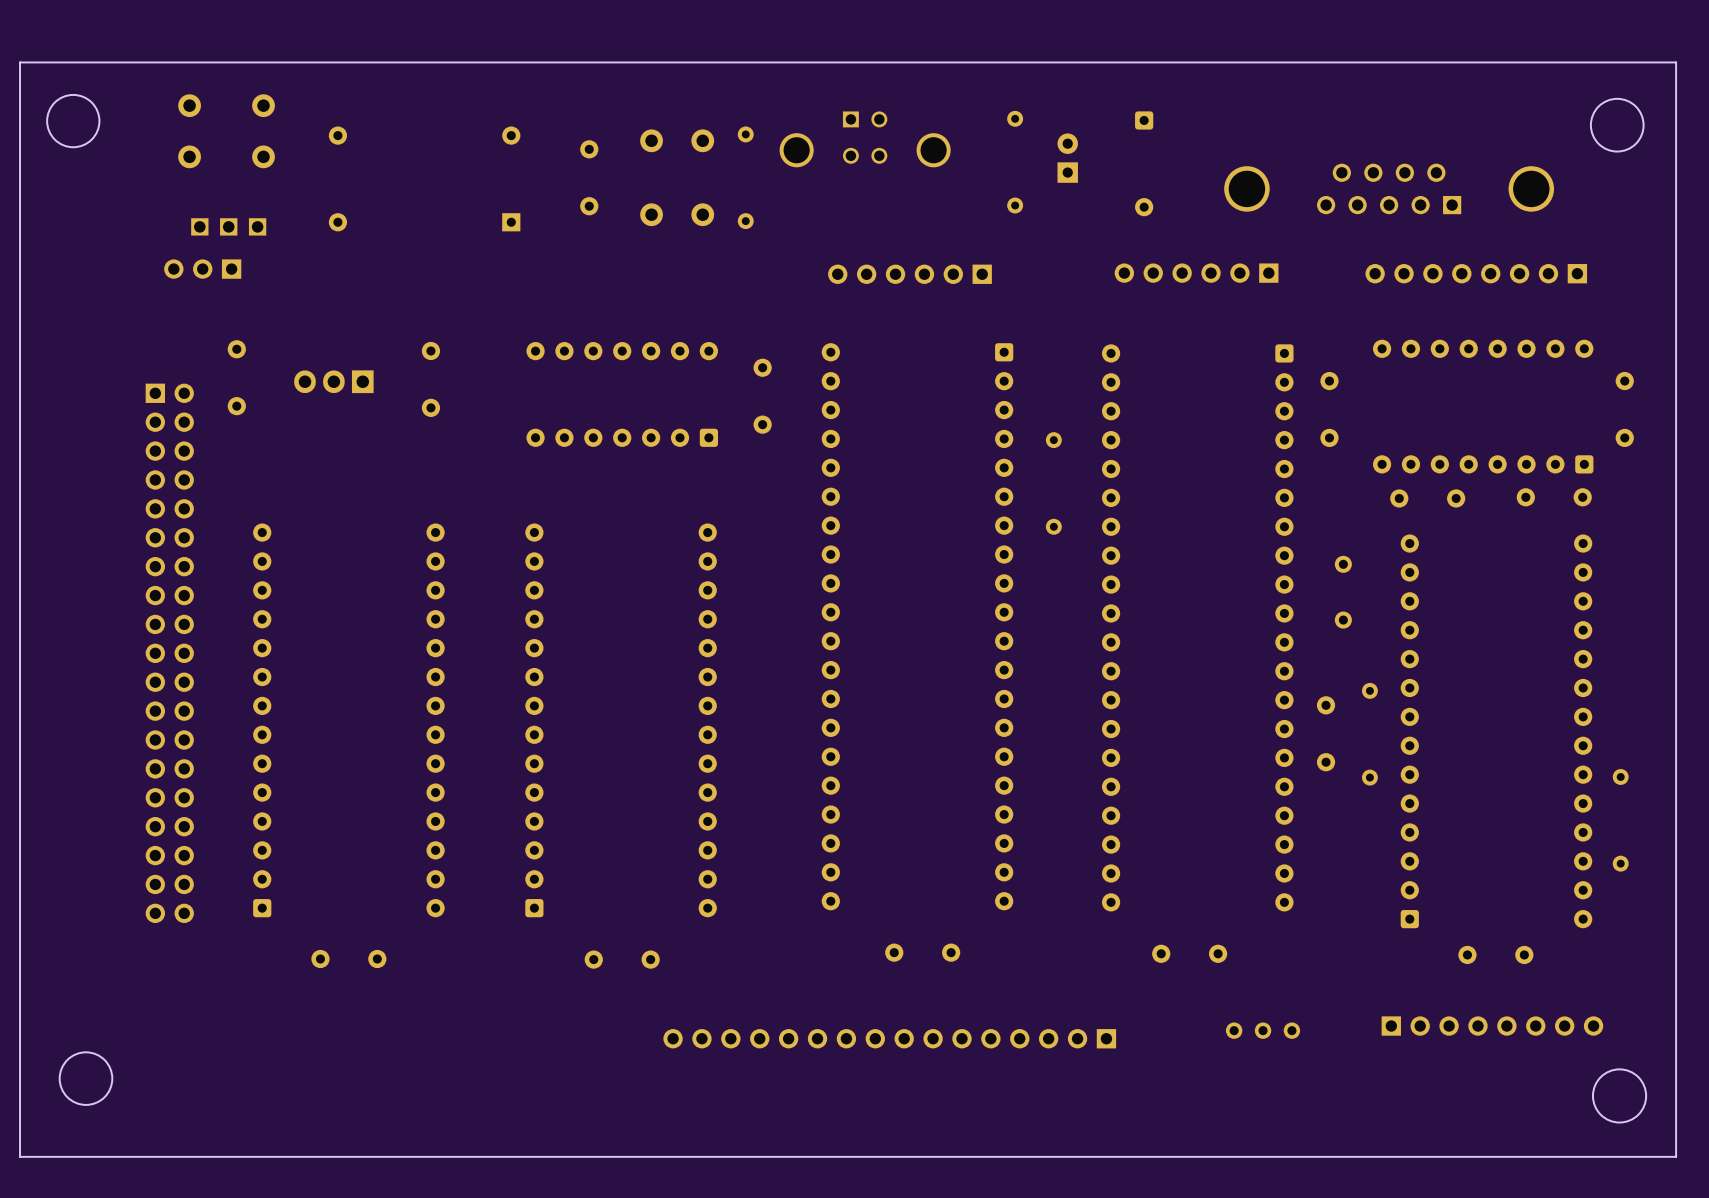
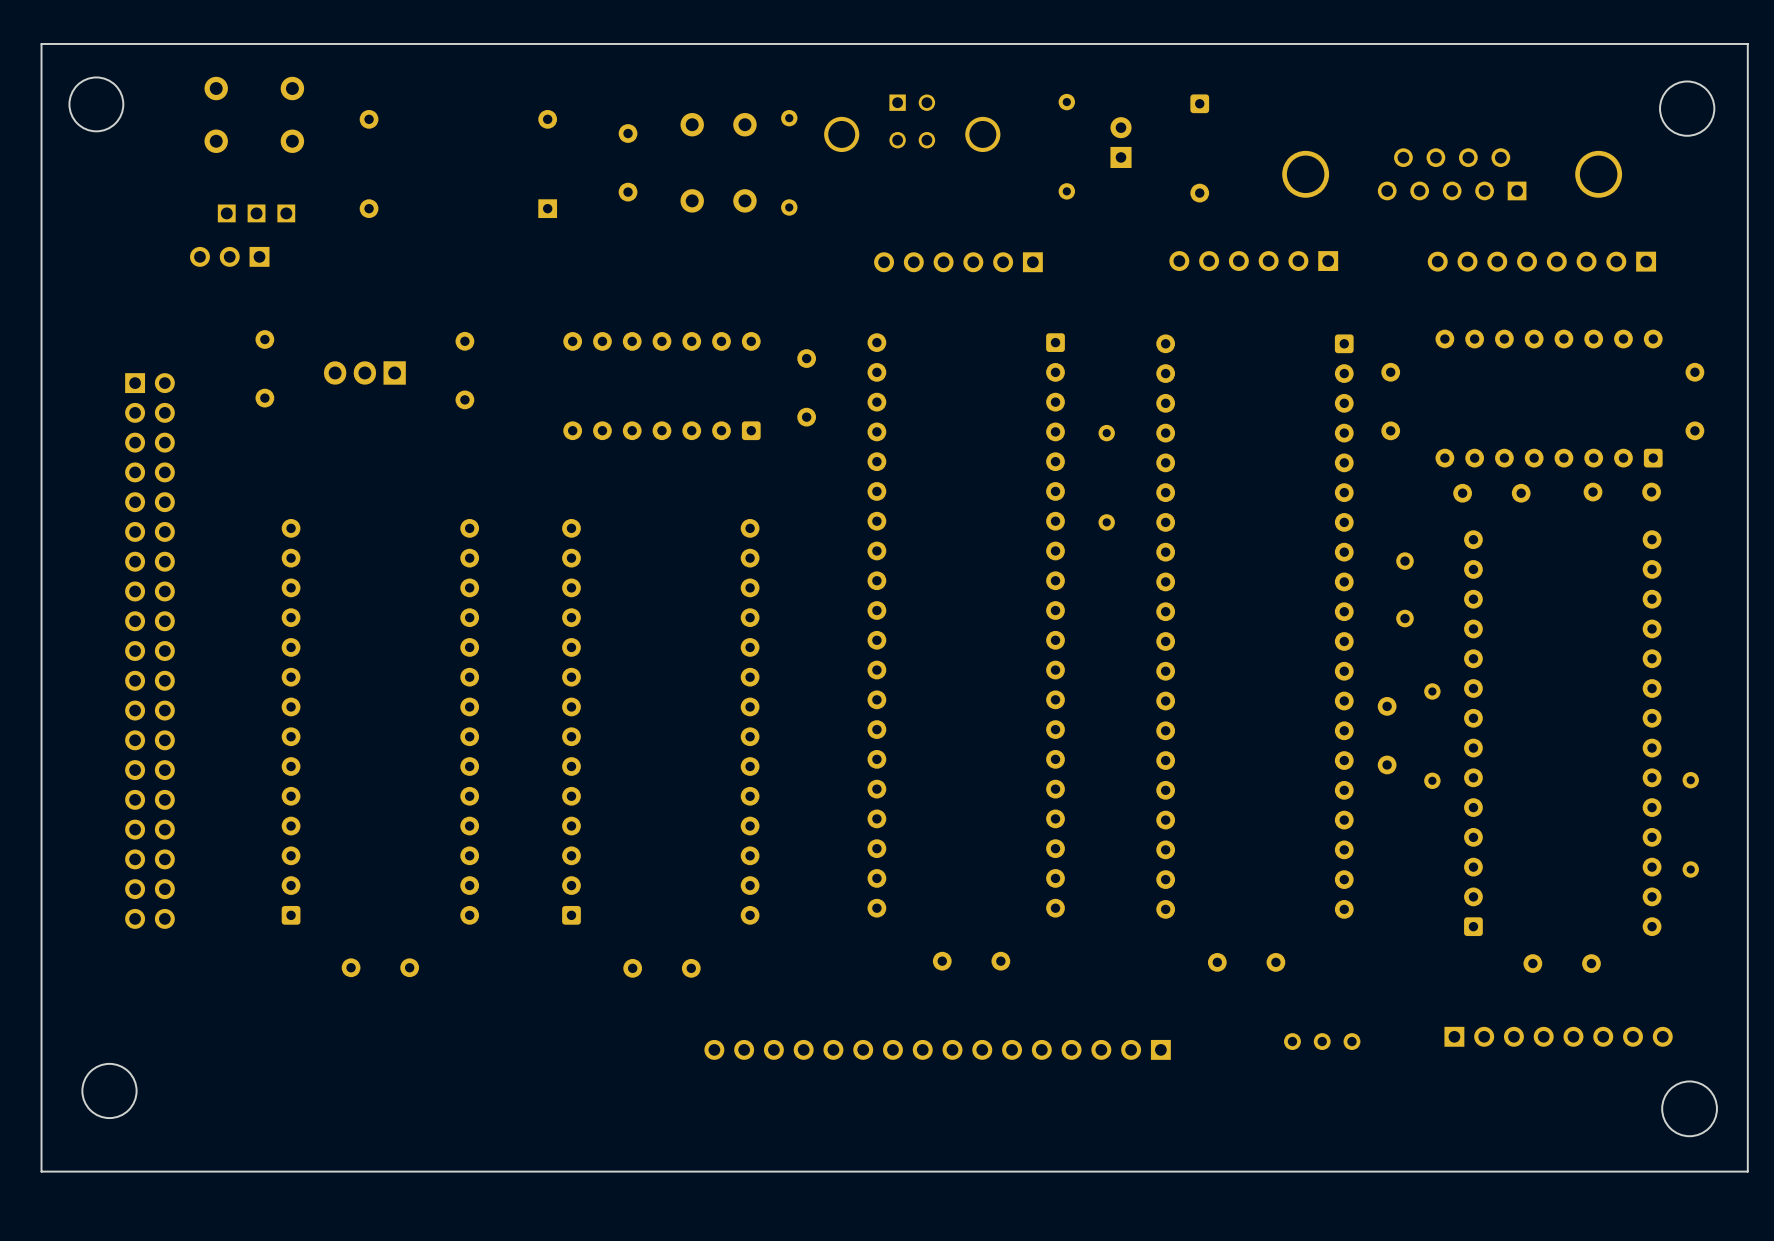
part position: (169, 653) -> (149, 651)

